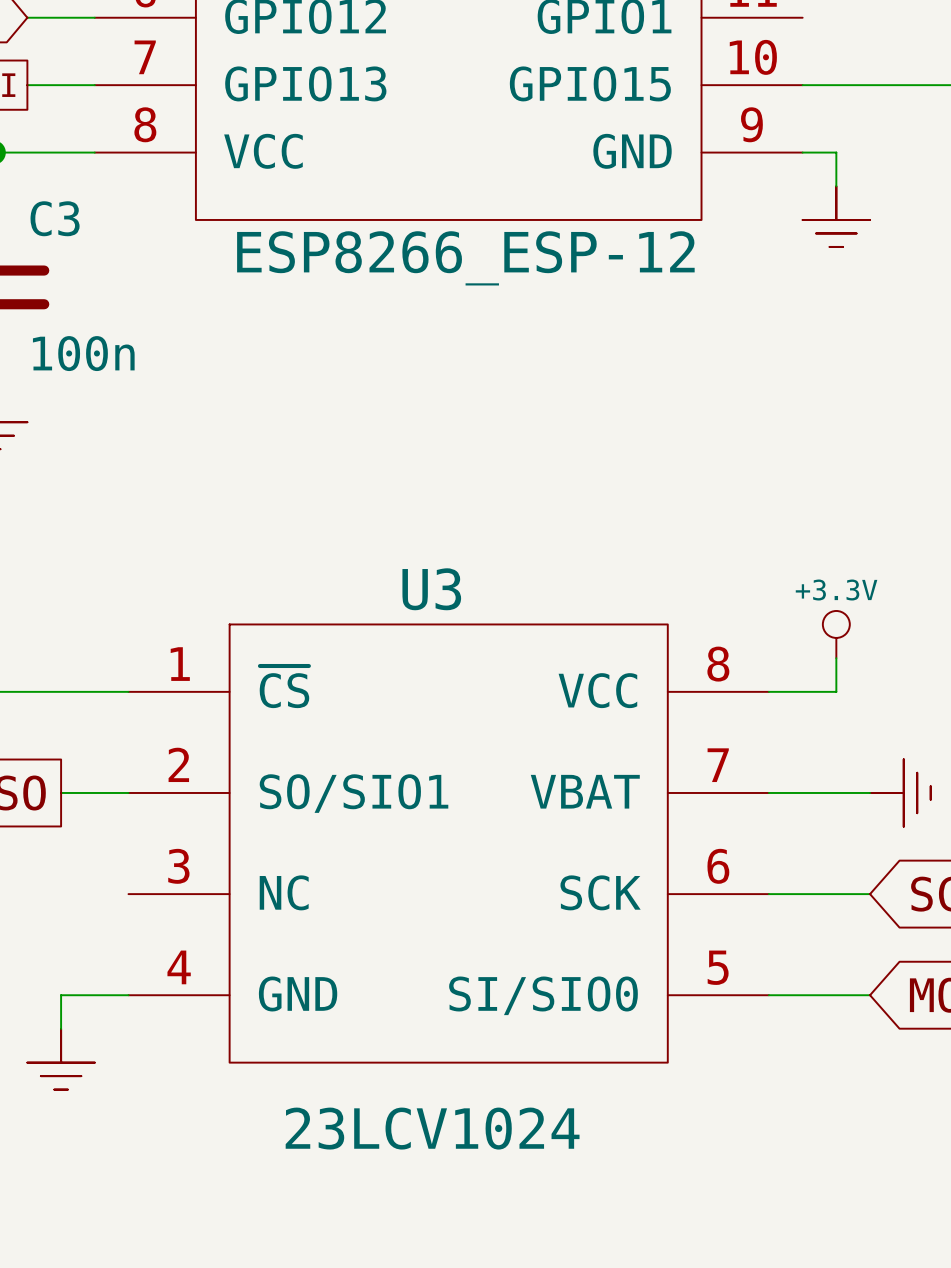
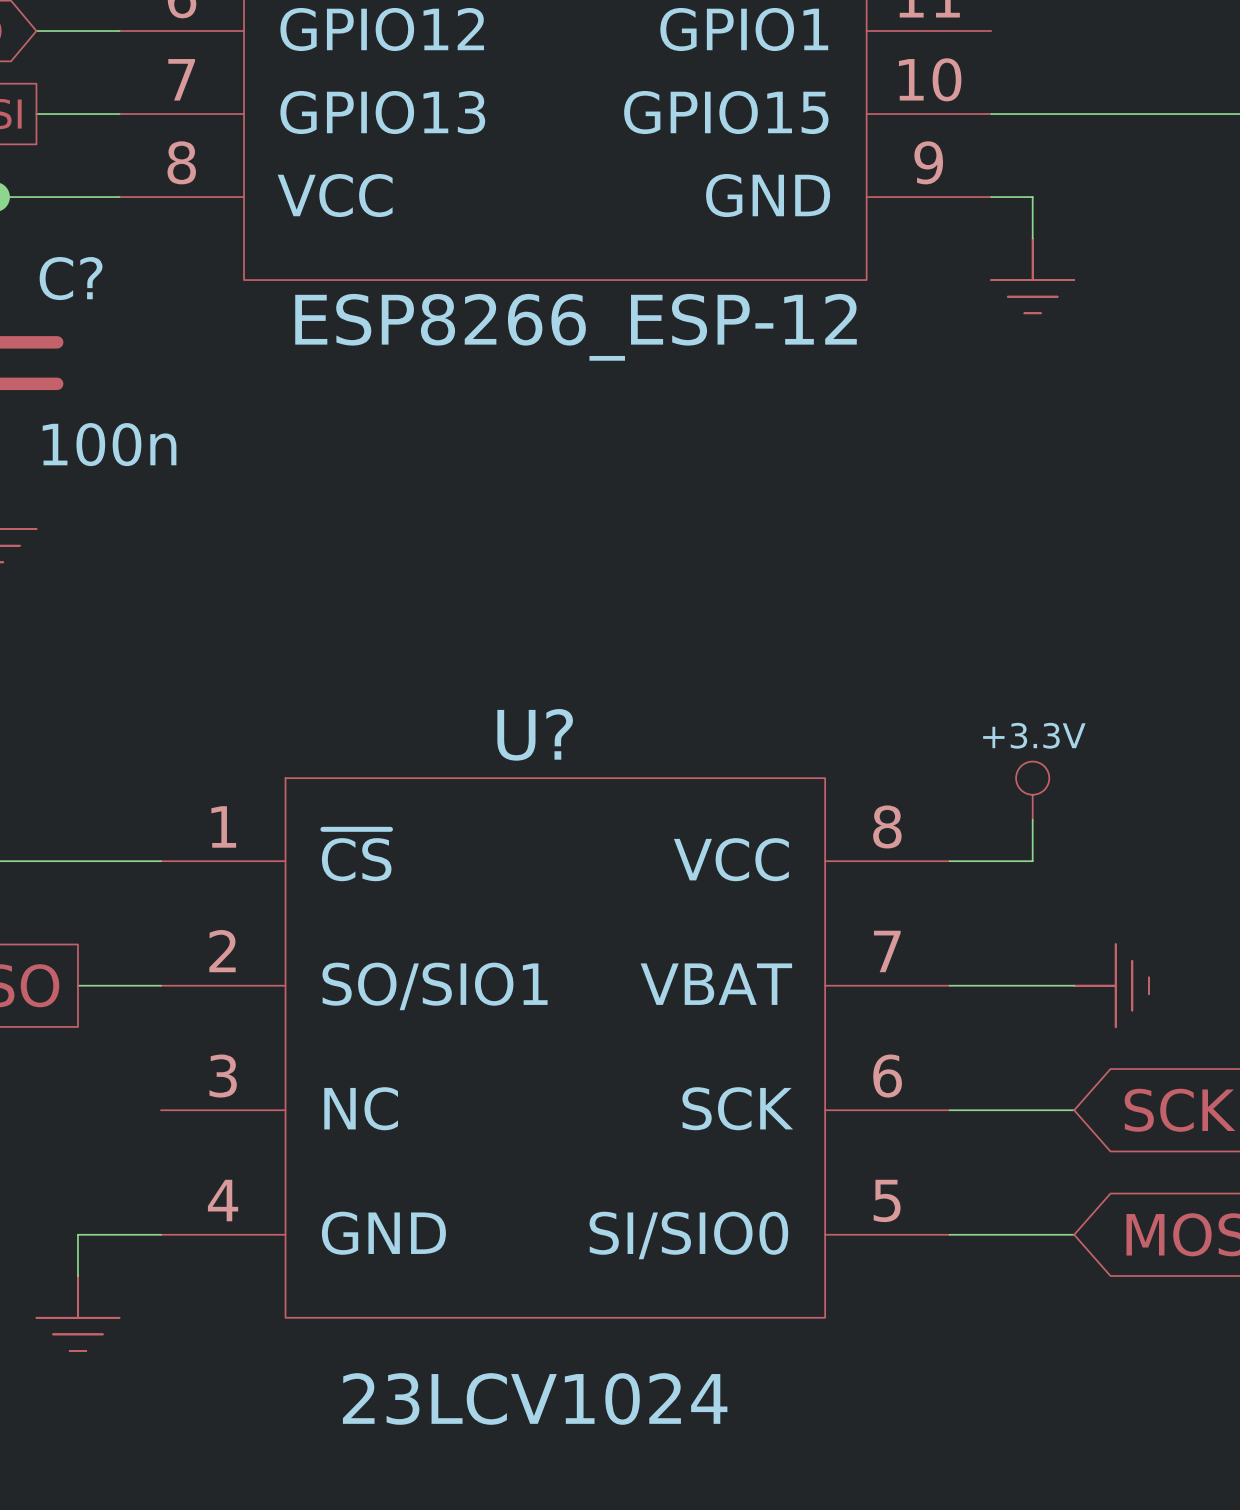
C3 name: C3 (55, 218) -> C? (71, 278)
U3 name: U3 (431, 589) -> U? (535, 734)

